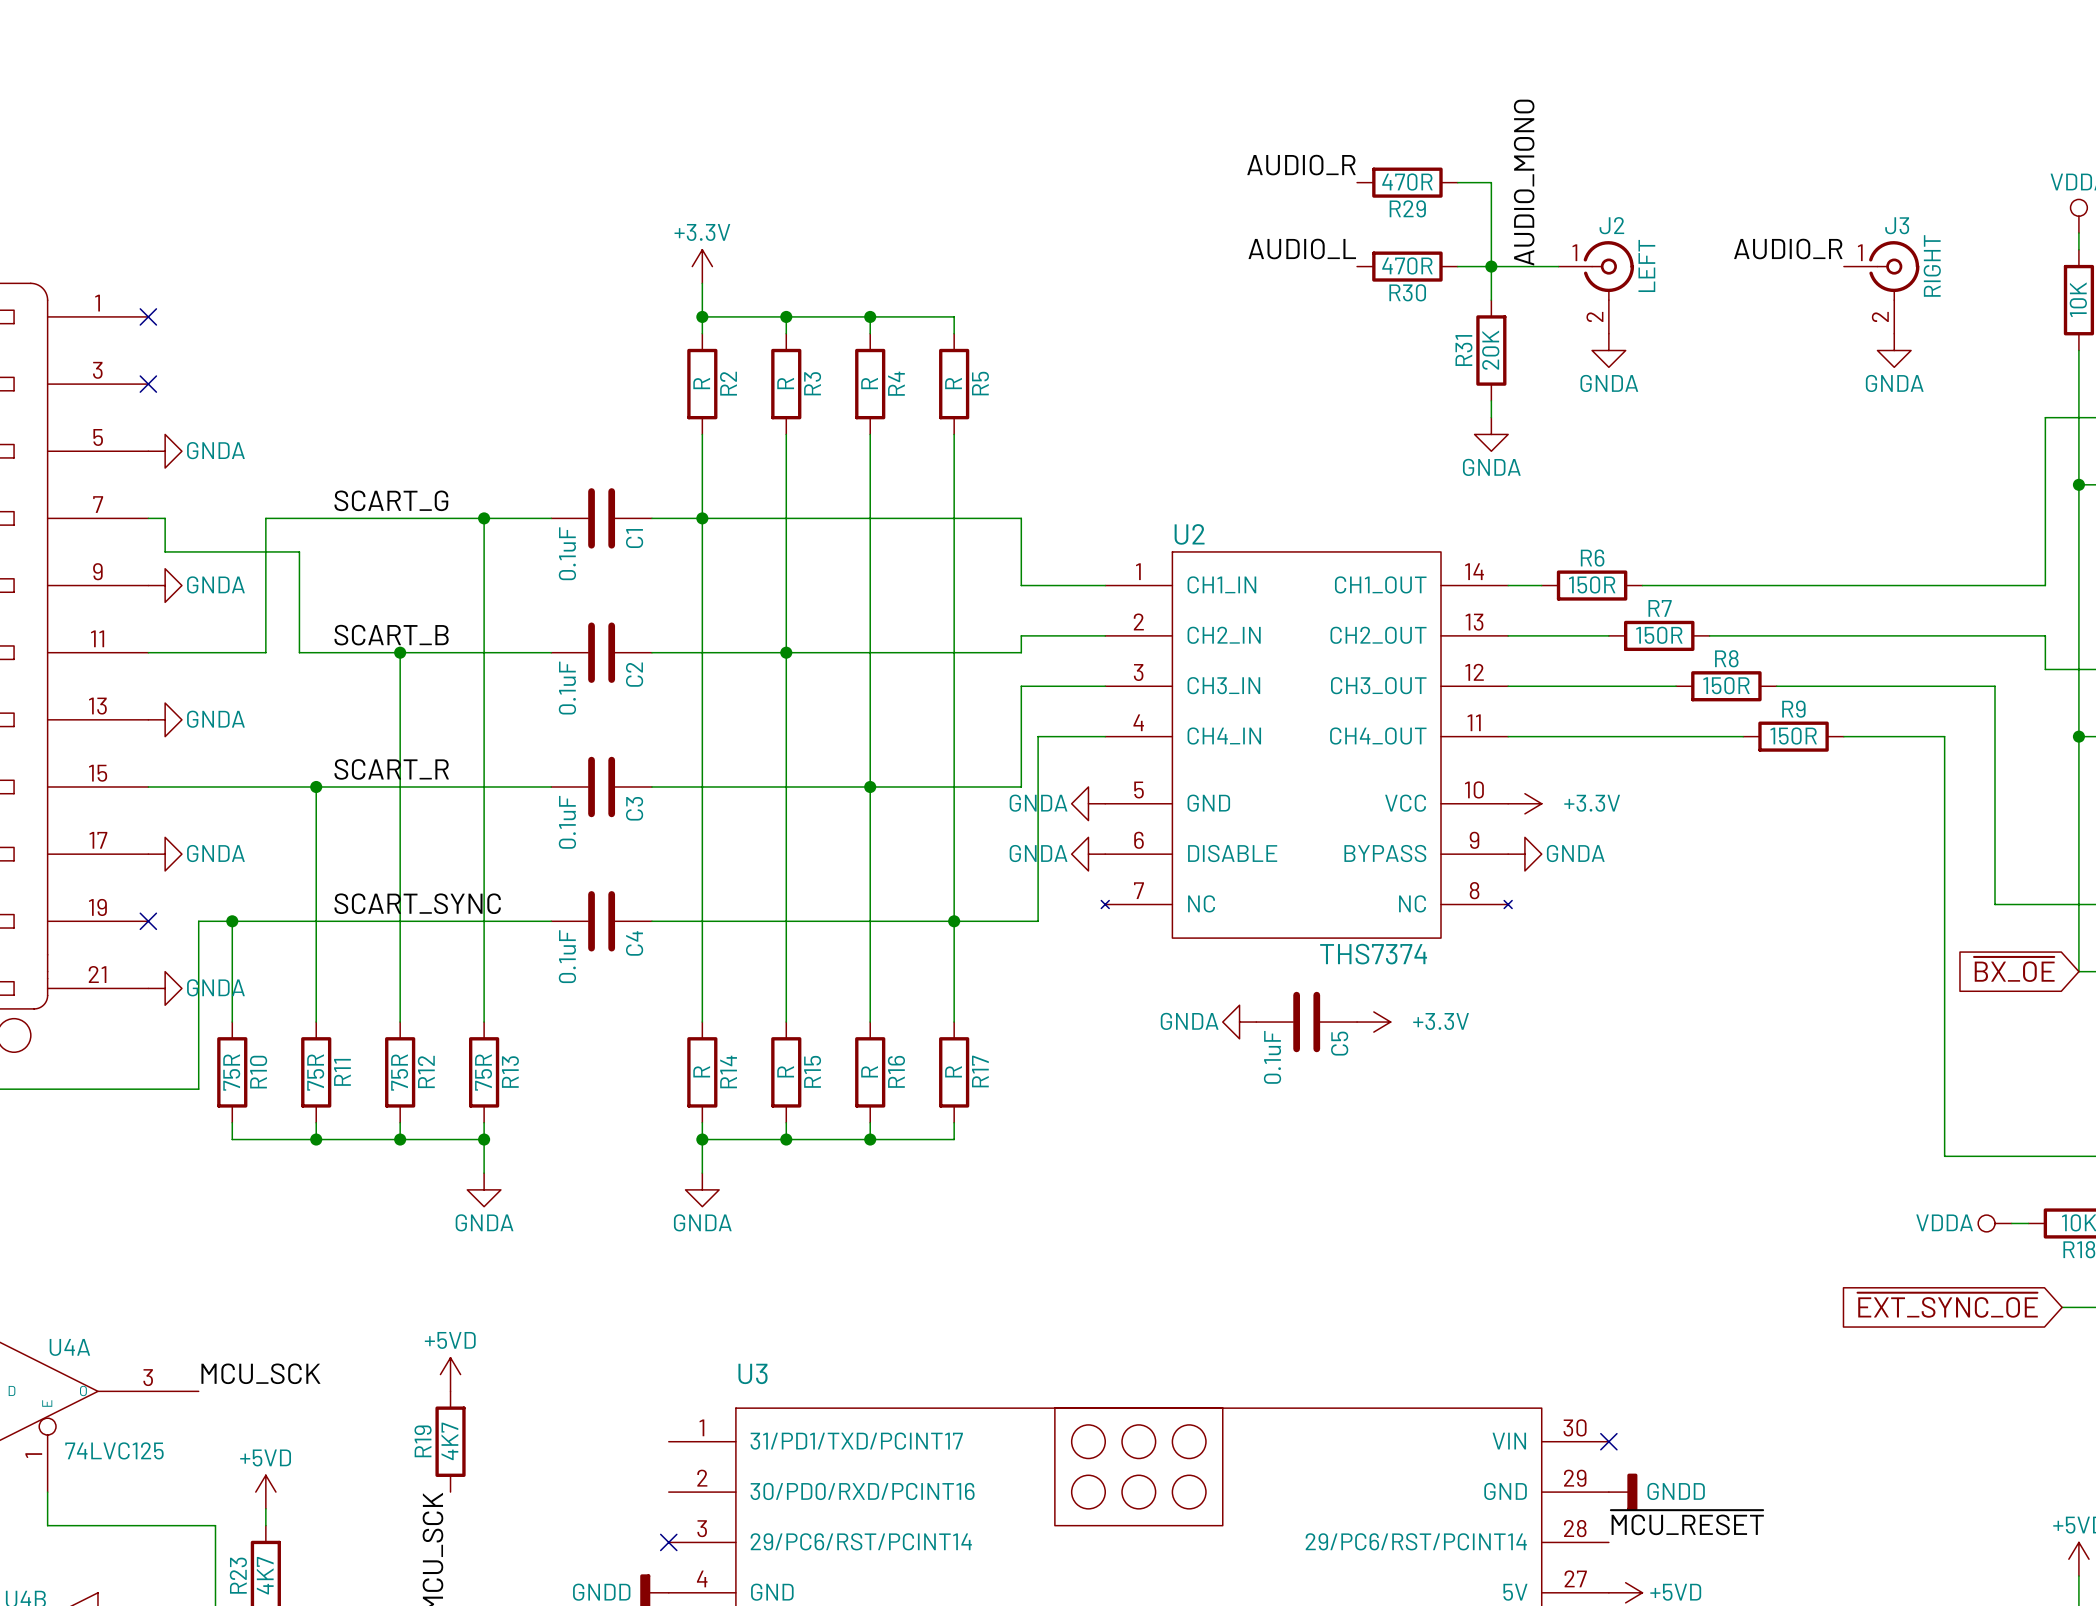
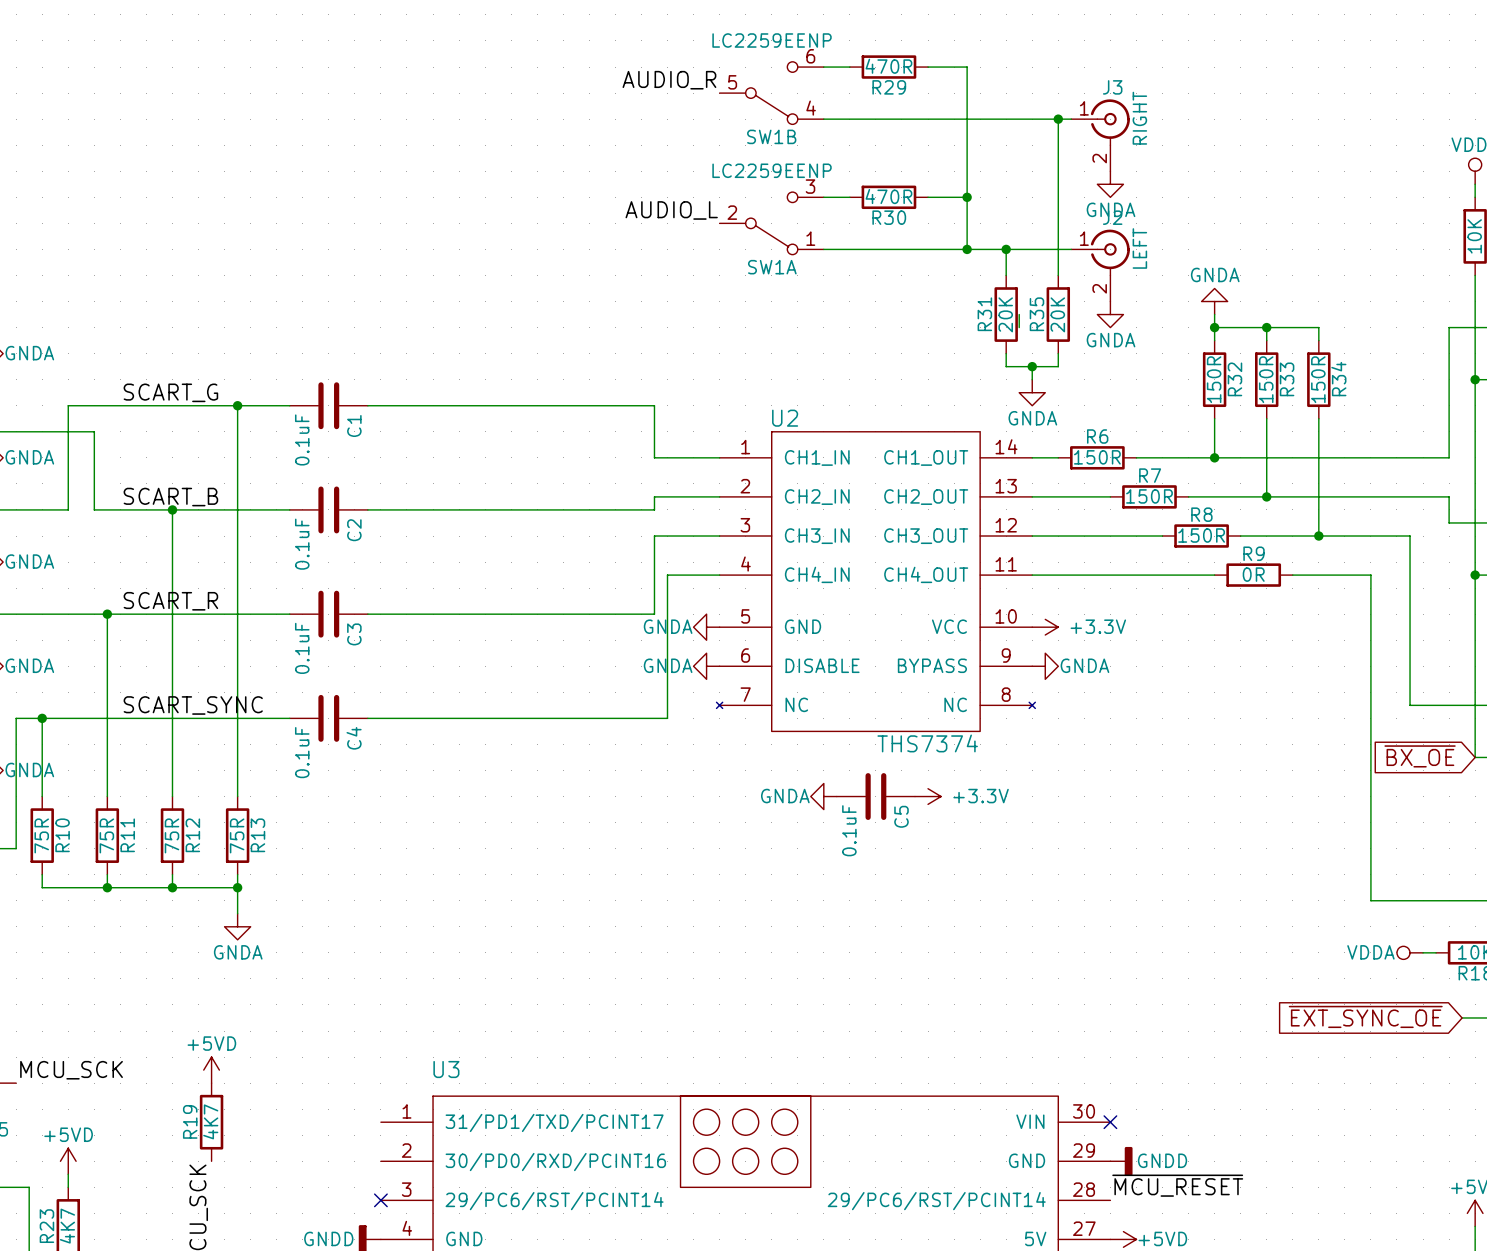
wire: none -> (823, 67) (849, 67)
wire: none -> (928, 67) (967, 67) (967, 249)
SW1B: none -> LC2259EENP (771, 93)
wire: none -> (823, 119) (1071, 119)
wire: none -> (1058, 119) (1058, 275)
junction: none -> (1058, 119)
label position: AUDIO_R (1301, 165) -> AUDIO_R (669, 80)
R29 position: (1407, 182) -> (888, 67)
wire: (1457, 182) (1491, 182) (1491, 300) -> none
label: AUDIO_MONO (1524, 182) -> none
power symbol: none -> GNDA (1110, 184)
wire: none -> (823, 197) (849, 197)
label position: AUDIO_L (1302, 249) -> AUDIO_L (671, 210)
wire: none -> (928, 197) (967, 197)
junction: none -> (967, 197)
label: AUDIO_R (1788, 249) -> none
power symbol: +3.3V (702, 266) -> none
R30 position: (1407, 266) -> (888, 197)
wire: (1457, 266) (1558, 266) -> none
junction: (1491, 266) -> none
wire: (702, 283) (702, 333) -> none
SW1A: none -> LC2259EENP (771, 223)
J2 position: (1596, 287) -> (1100, 265)
J3 position: (1881, 287) -> (1100, 135)
wire: (702, 316) (954, 316) (954, 333) -> none
junction: (702, 316) -> none
wire: (786, 316) (786, 333) -> none
junction: (786, 316) -> none
wire: (870, 316) (870, 333) -> none
junction: (870, 316) -> none
wire: none -> (823, 249) (1071, 249)
junction: none -> (967, 249)
wire: none -> (1006, 249) (1006, 275)
junction: none -> (1006, 249)
R31 position: (1491, 350) -> (1006, 314)
power symbol position: GNDA (1608, 350) -> GNDA (1110, 314)
power symbol: GNDA (1894, 350) -> none
R2: R (702, 384) -> none
R3: R (786, 384) -> none
R4: R (870, 384) -> none
R5: R (954, 384) -> none
power symbol: none -> GNDA (1214, 301)
R35: none -> 20K (1058, 314)
wire: none -> (1214, 314) (1214, 340)
wire: none -> (1214, 327) (1318, 327) (1318, 340)
junction: none -> (1214, 327)
wire: none -> (1266, 327) (1266, 340)
junction: none -> (1266, 327)
wire: (702, 434) (702, 1022) -> none
wire: (786, 434) (786, 1022) -> none
wire: (870, 434) (870, 1022) -> none
wire: (954, 434) (954, 1022) -> none
power symbol: GNDA (1491, 434) -> none
wire: none -> (1006, 353) (1006, 366) (1058, 366) (1058, 353)
wire: none -> (1032, 366) (1032, 379)
junction: none -> (1032, 366)
R32: none -> 150R (1214, 379)
R33: none -> 150R (1266, 379)
R34: none -> 150R (1318, 379)
power symbol: none -> GNDA (1032, 392)
junction: (702, 518) -> none
wire: none -> (1214, 418) (1214, 457)
wire: none -> (1266, 418) (1266, 496)
wire: none -> (1318, 418) (1318, 536)
junction: none -> (1214, 457)
junction: none -> (1266, 496)
junction: (786, 652) -> none
junction: none -> (1318, 536)
R9 value: 150R (1793, 736) -> 0R (1253, 574)
junction: (870, 786) -> none
junction: (954, 921) -> none
R14: R (702, 1072) -> none
R15: R (786, 1072) -> none
R16: R (870, 1072) -> none
R17: R (954, 1072) -> none
wire: (702, 1122) (702, 1173) -> none
wire: (786, 1122) (786, 1139) -> none
wire: (870, 1122) (870, 1139) -> none
wire: (954, 1122) (954, 1139) (702, 1139) -> none
junction: (702, 1139) -> none
junction: (786, 1139) -> none
junction: (870, 1139) -> none
power symbol: GNDA (702, 1189) -> none

